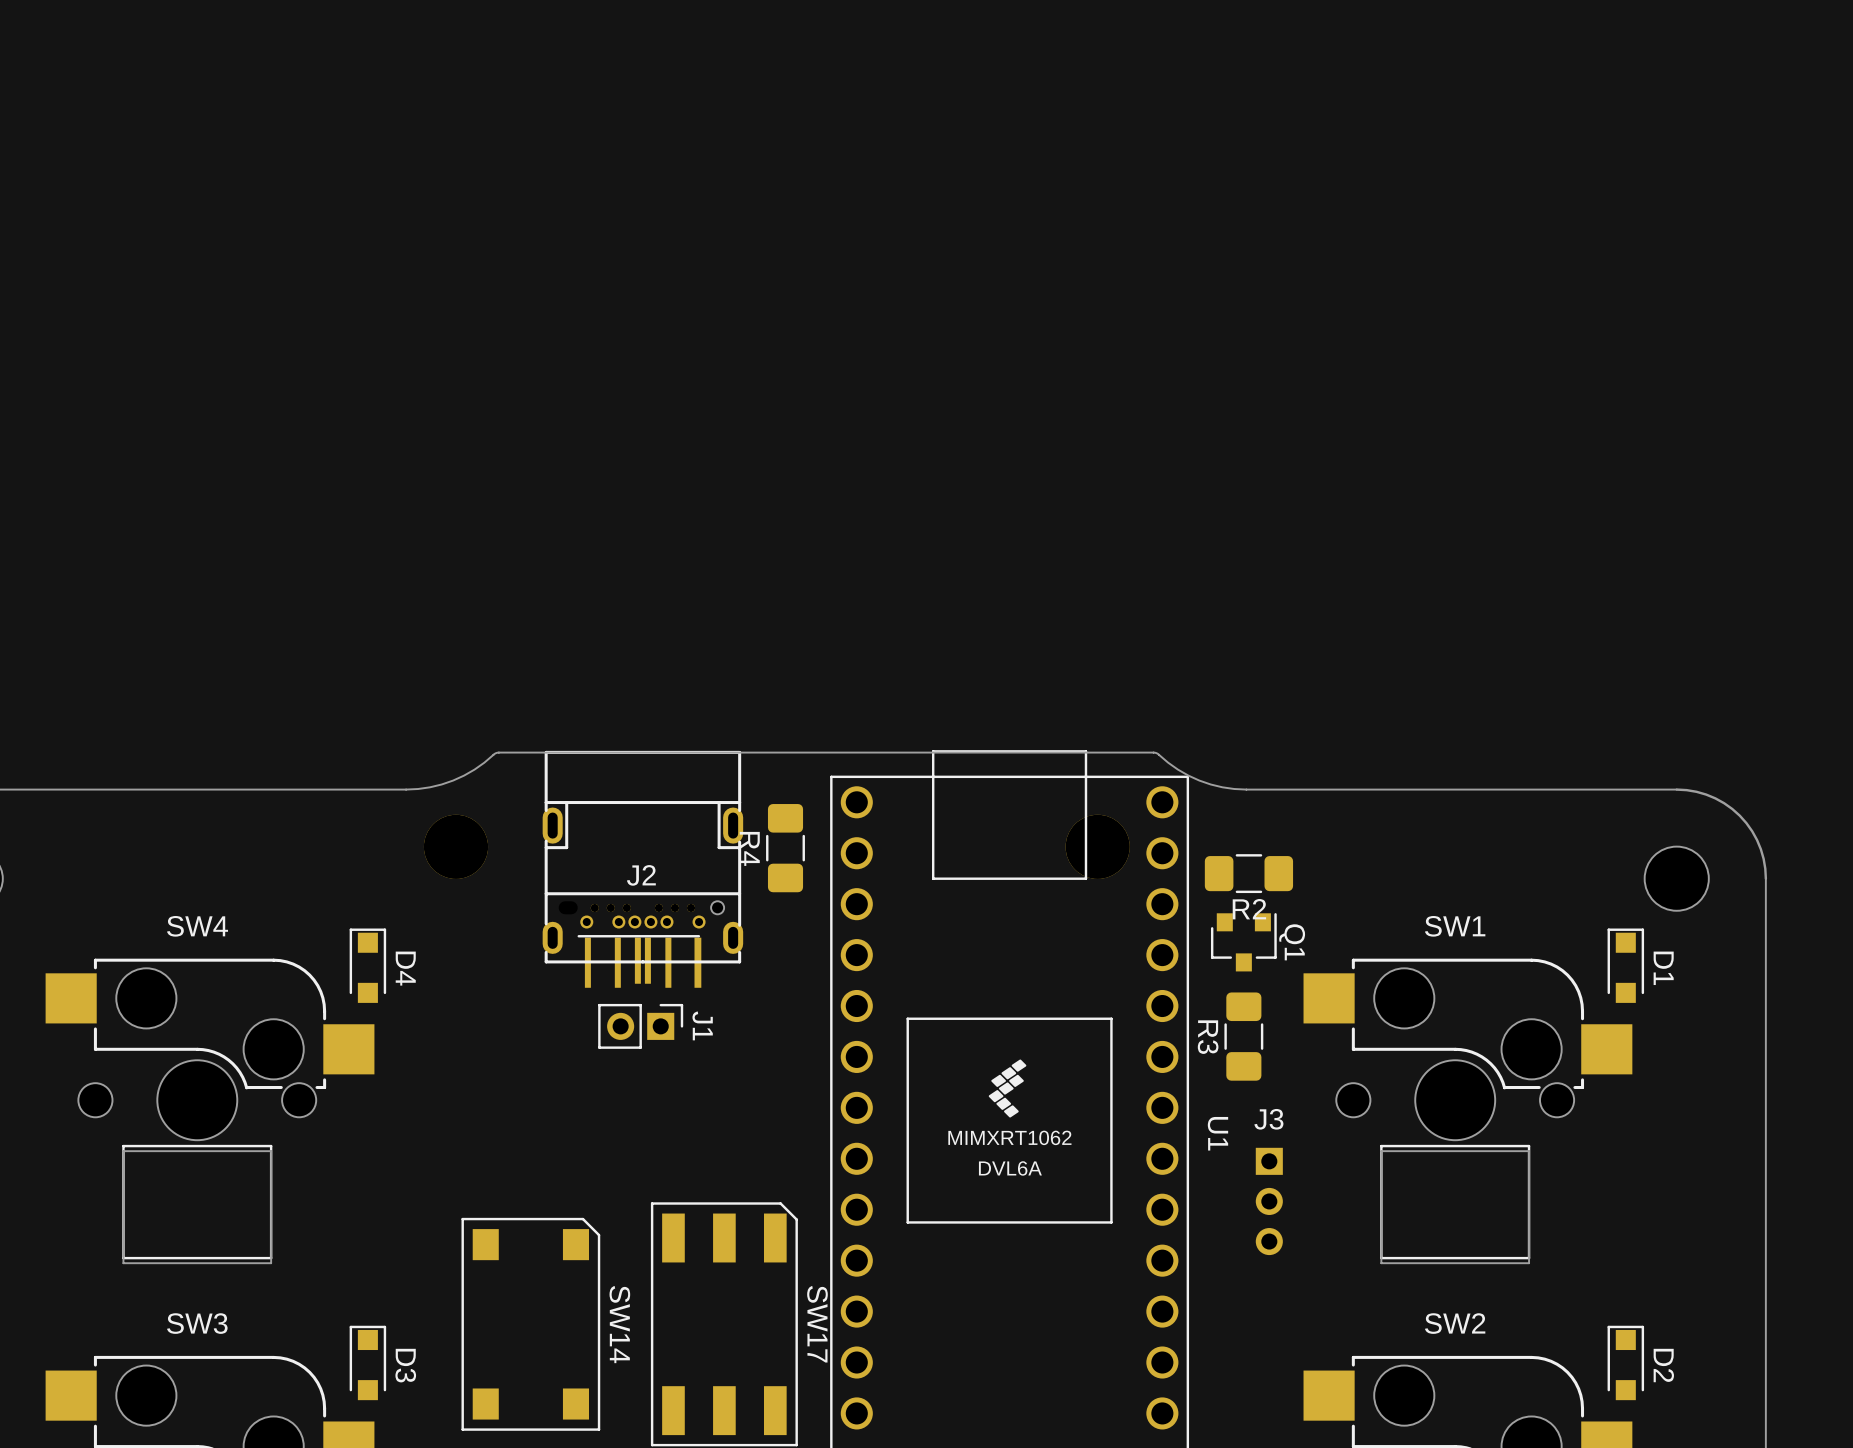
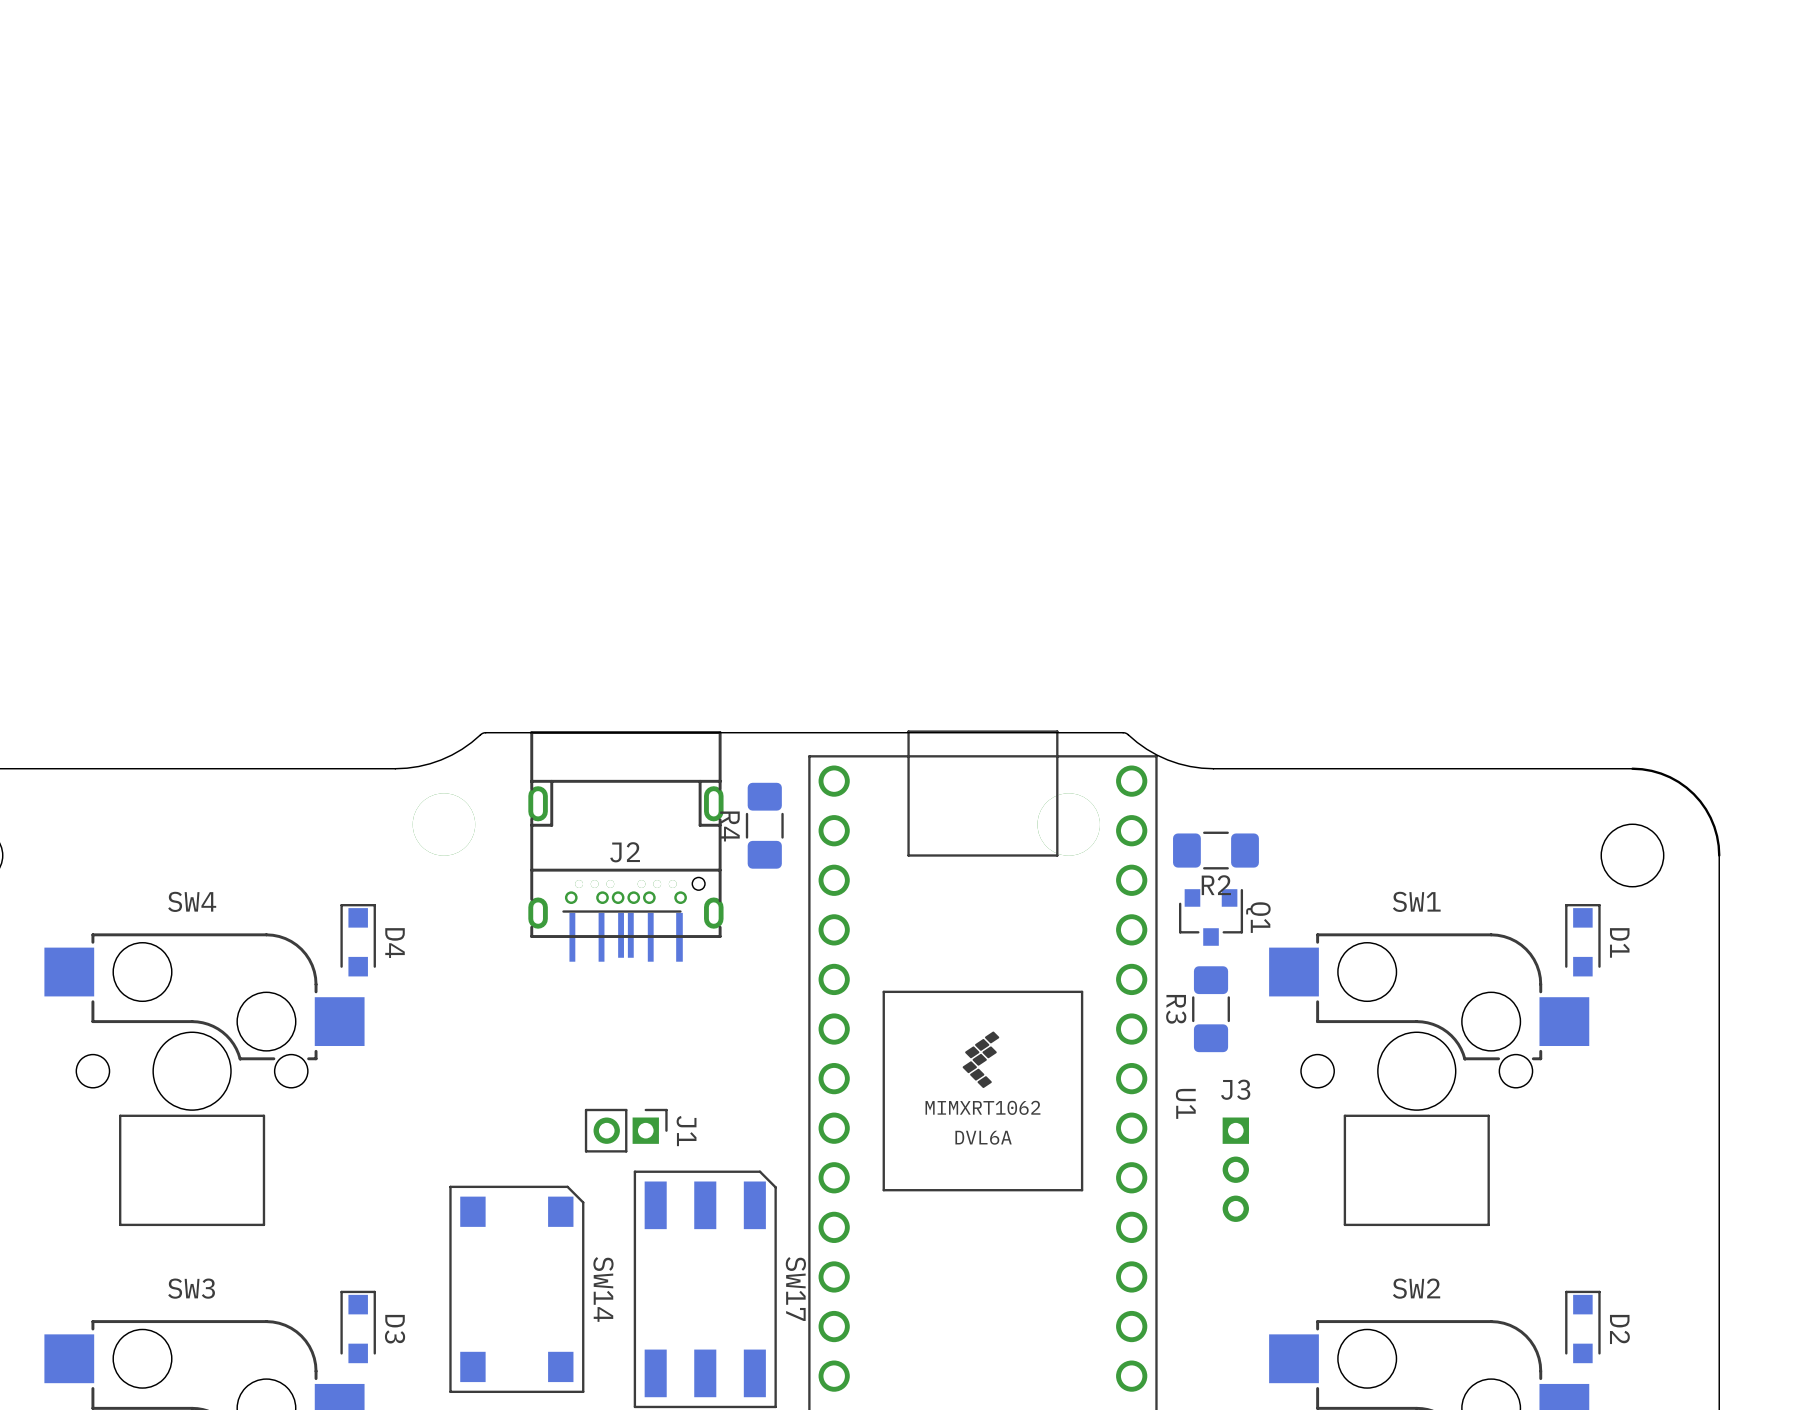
J1 position: (640, 1026) -> (626, 1130)
board edge: (271, 1151) (123, 1151) (123, 1263) (271, 1263) (271, 1151) -> none
board edge: (1529, 1151) (1381, 1151) (1381, 1263) (1529, 1263) (1529, 1151) -> none

